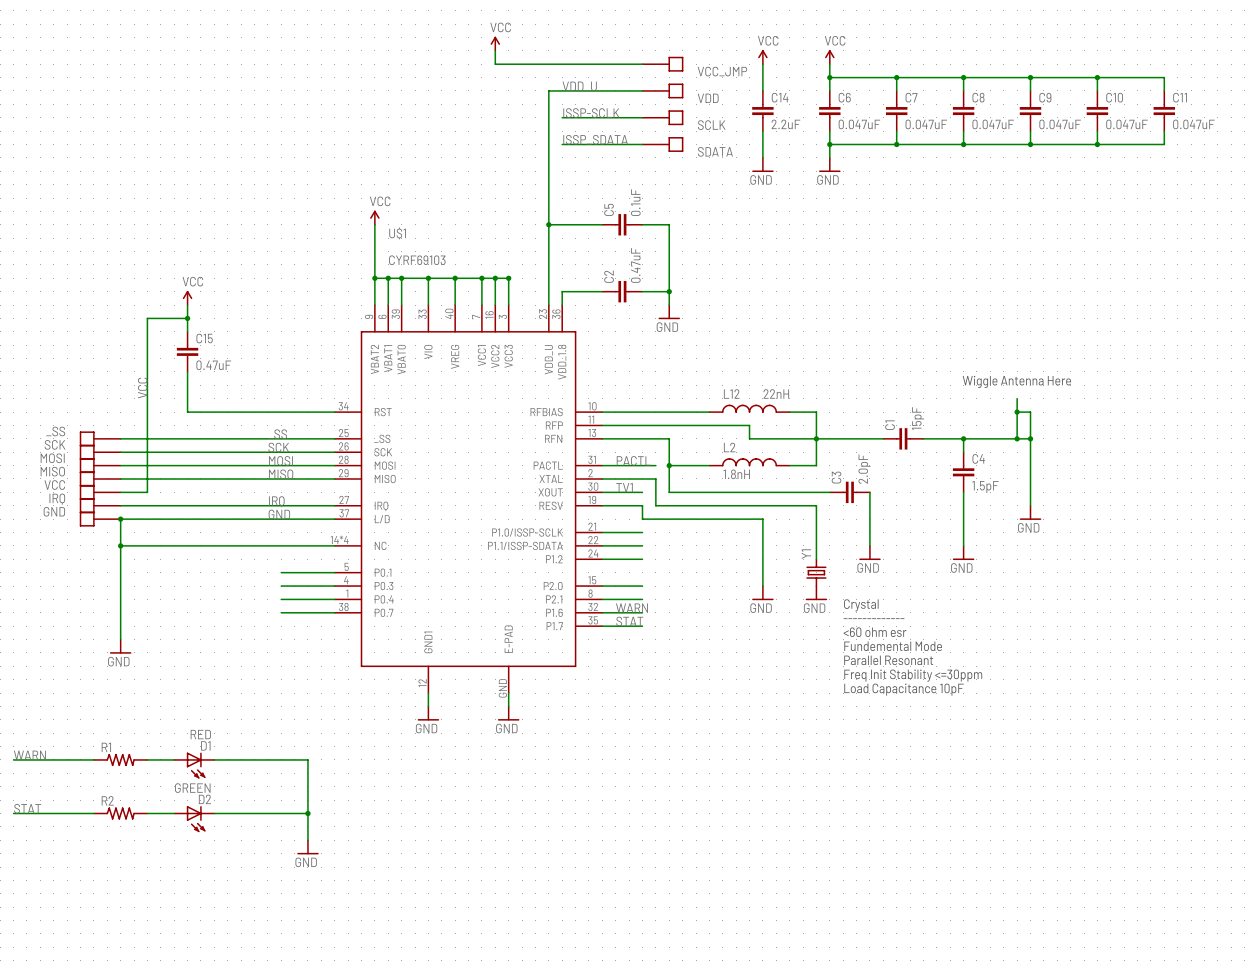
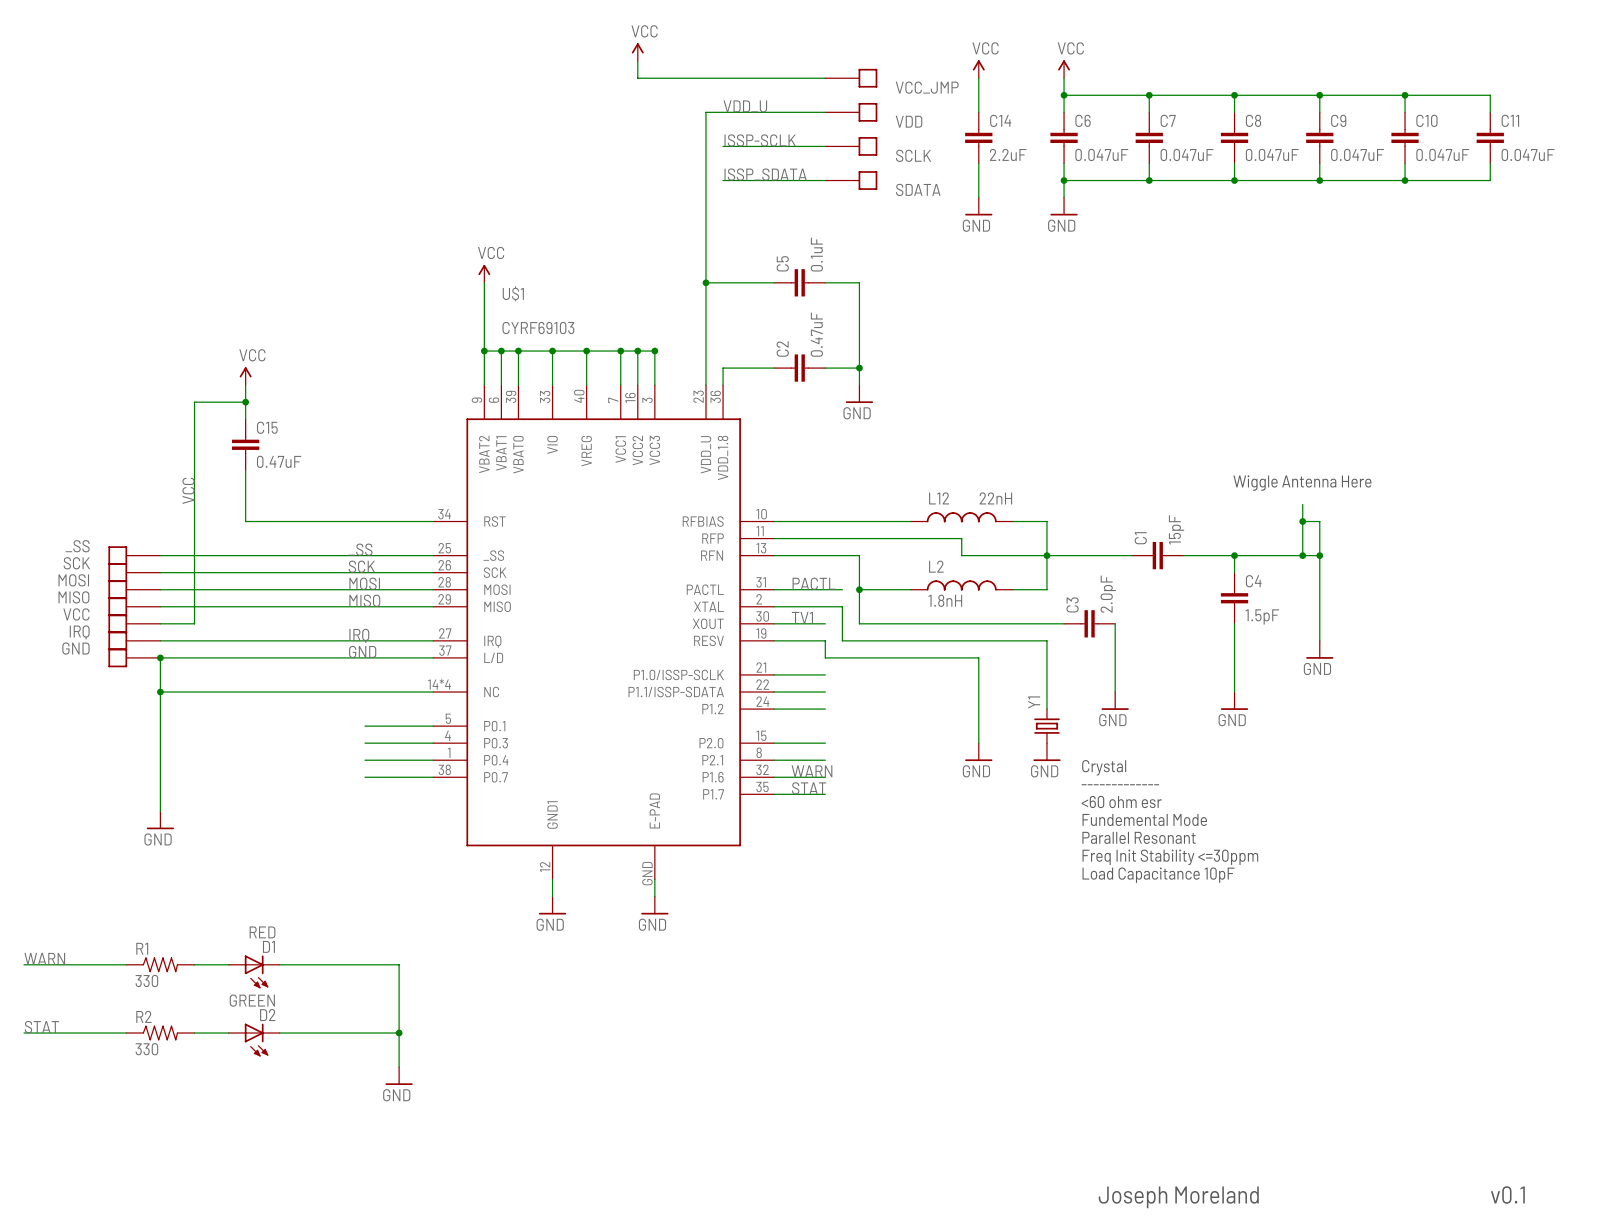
R1 value: none -> 330 (146, 981)
R2 value: none -> 330 (146, 1049)
text: none -> v0.1 (1507, 1194)
text: none -> Joseph Moreland (1178, 1197)

